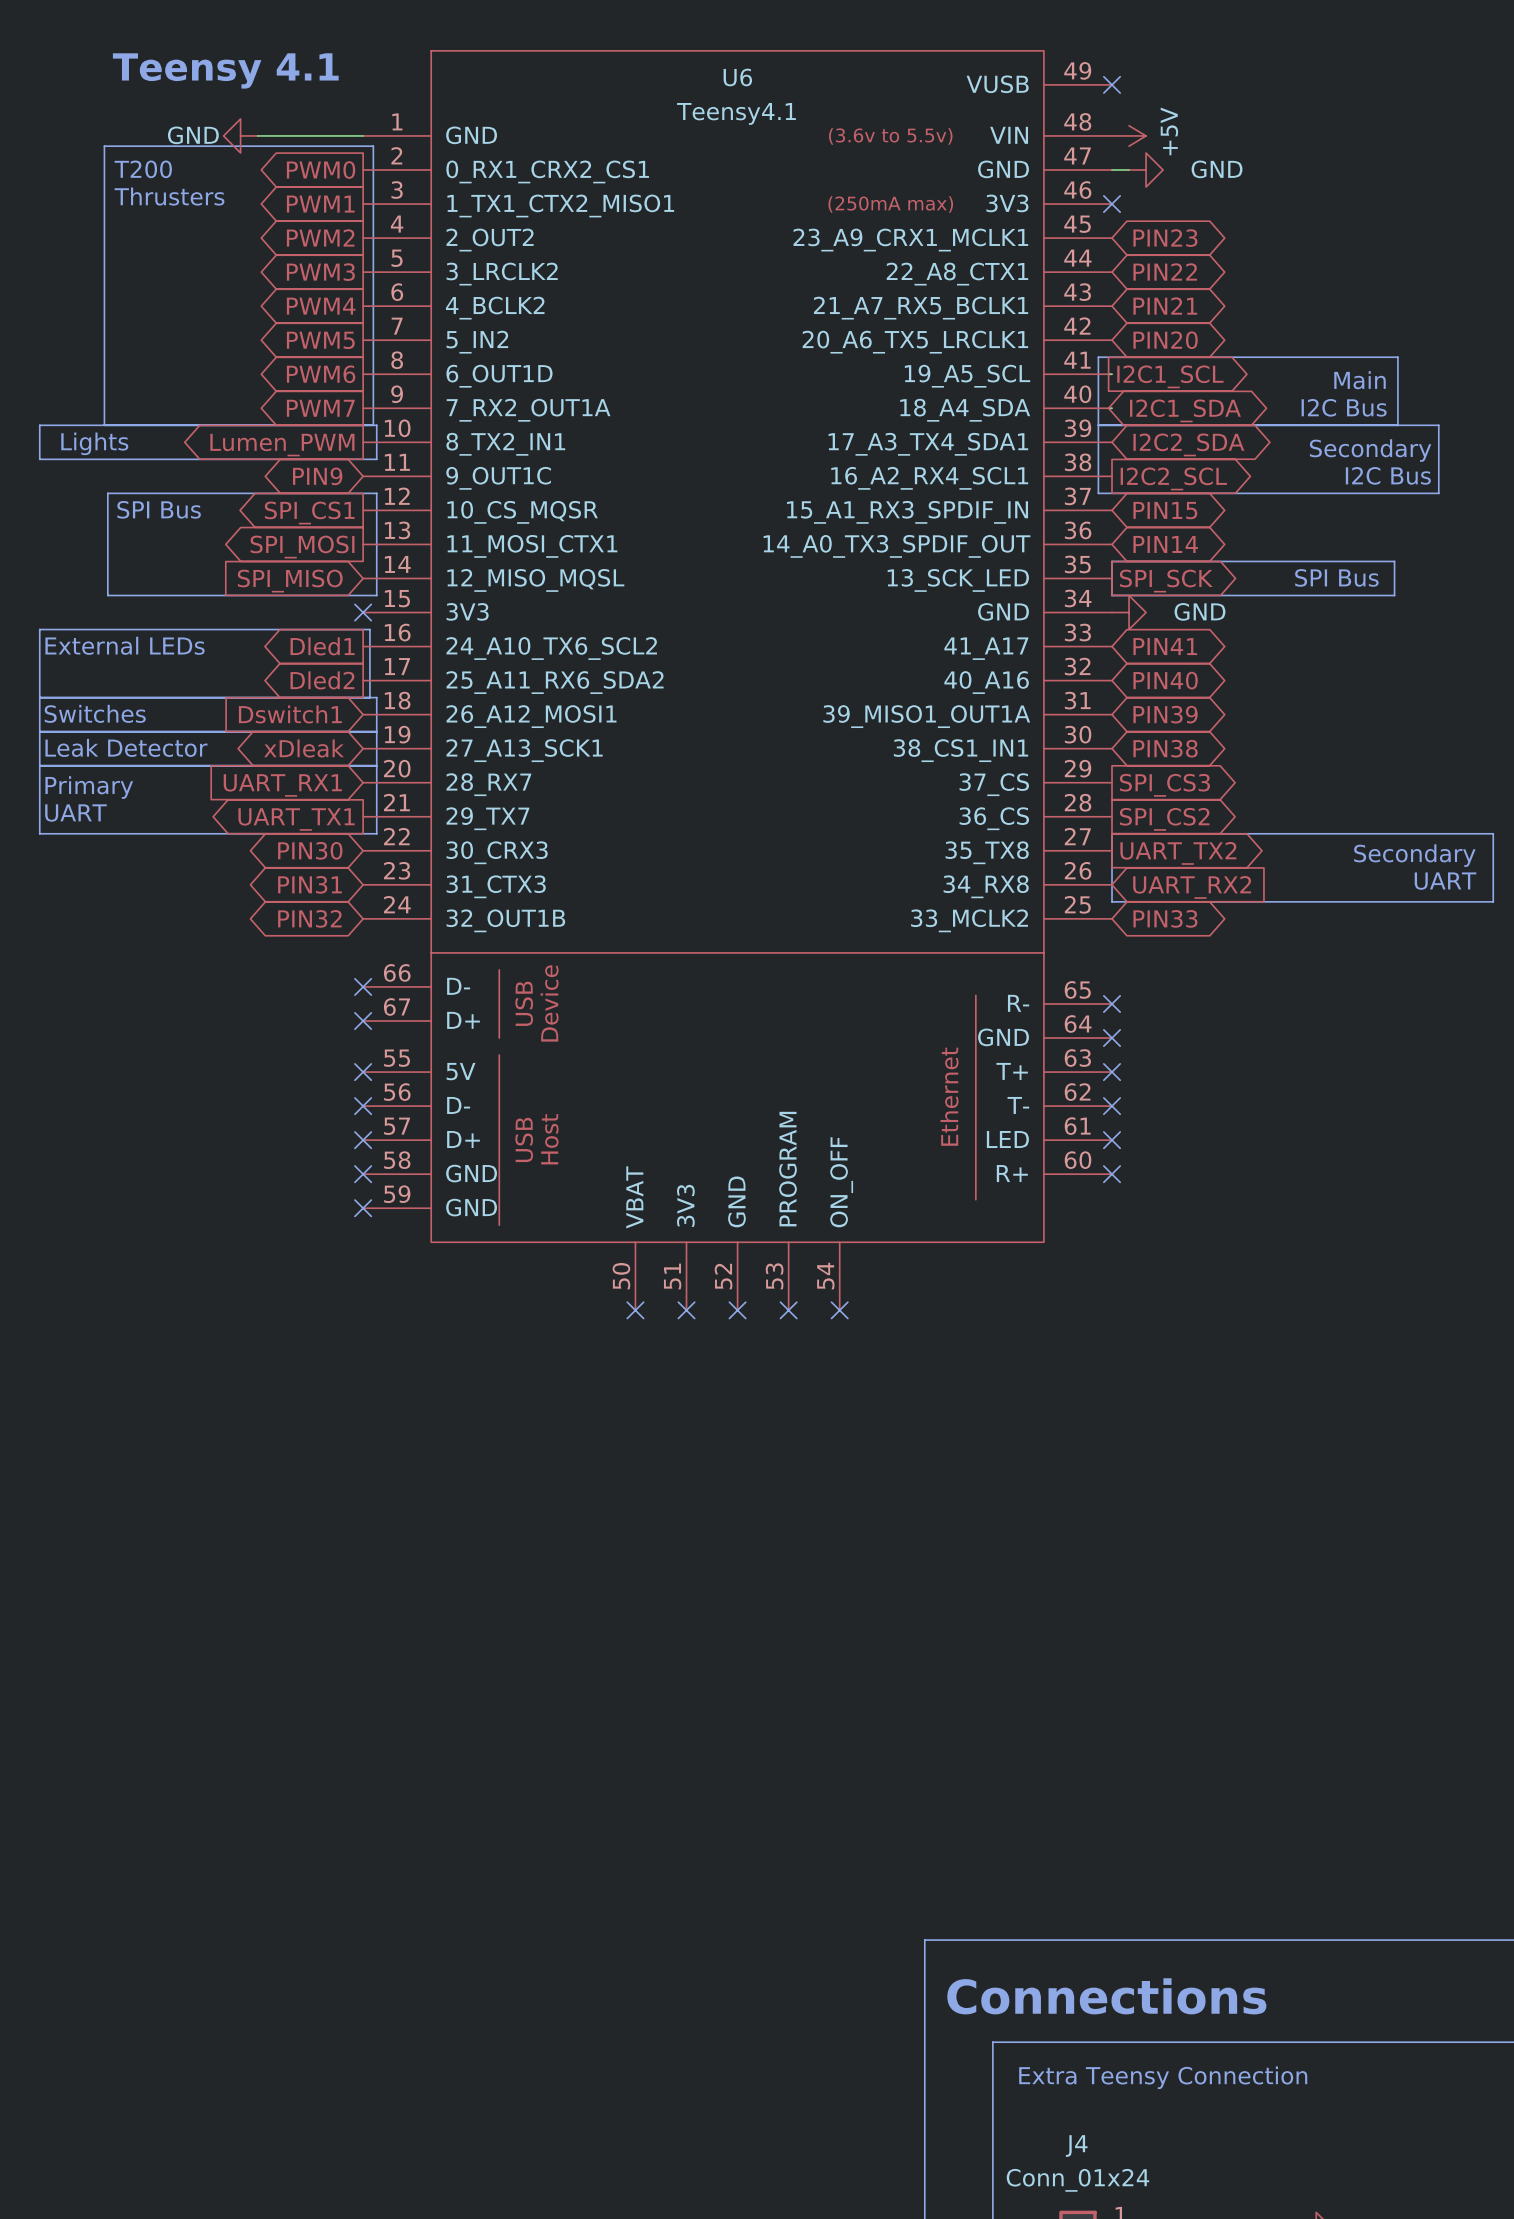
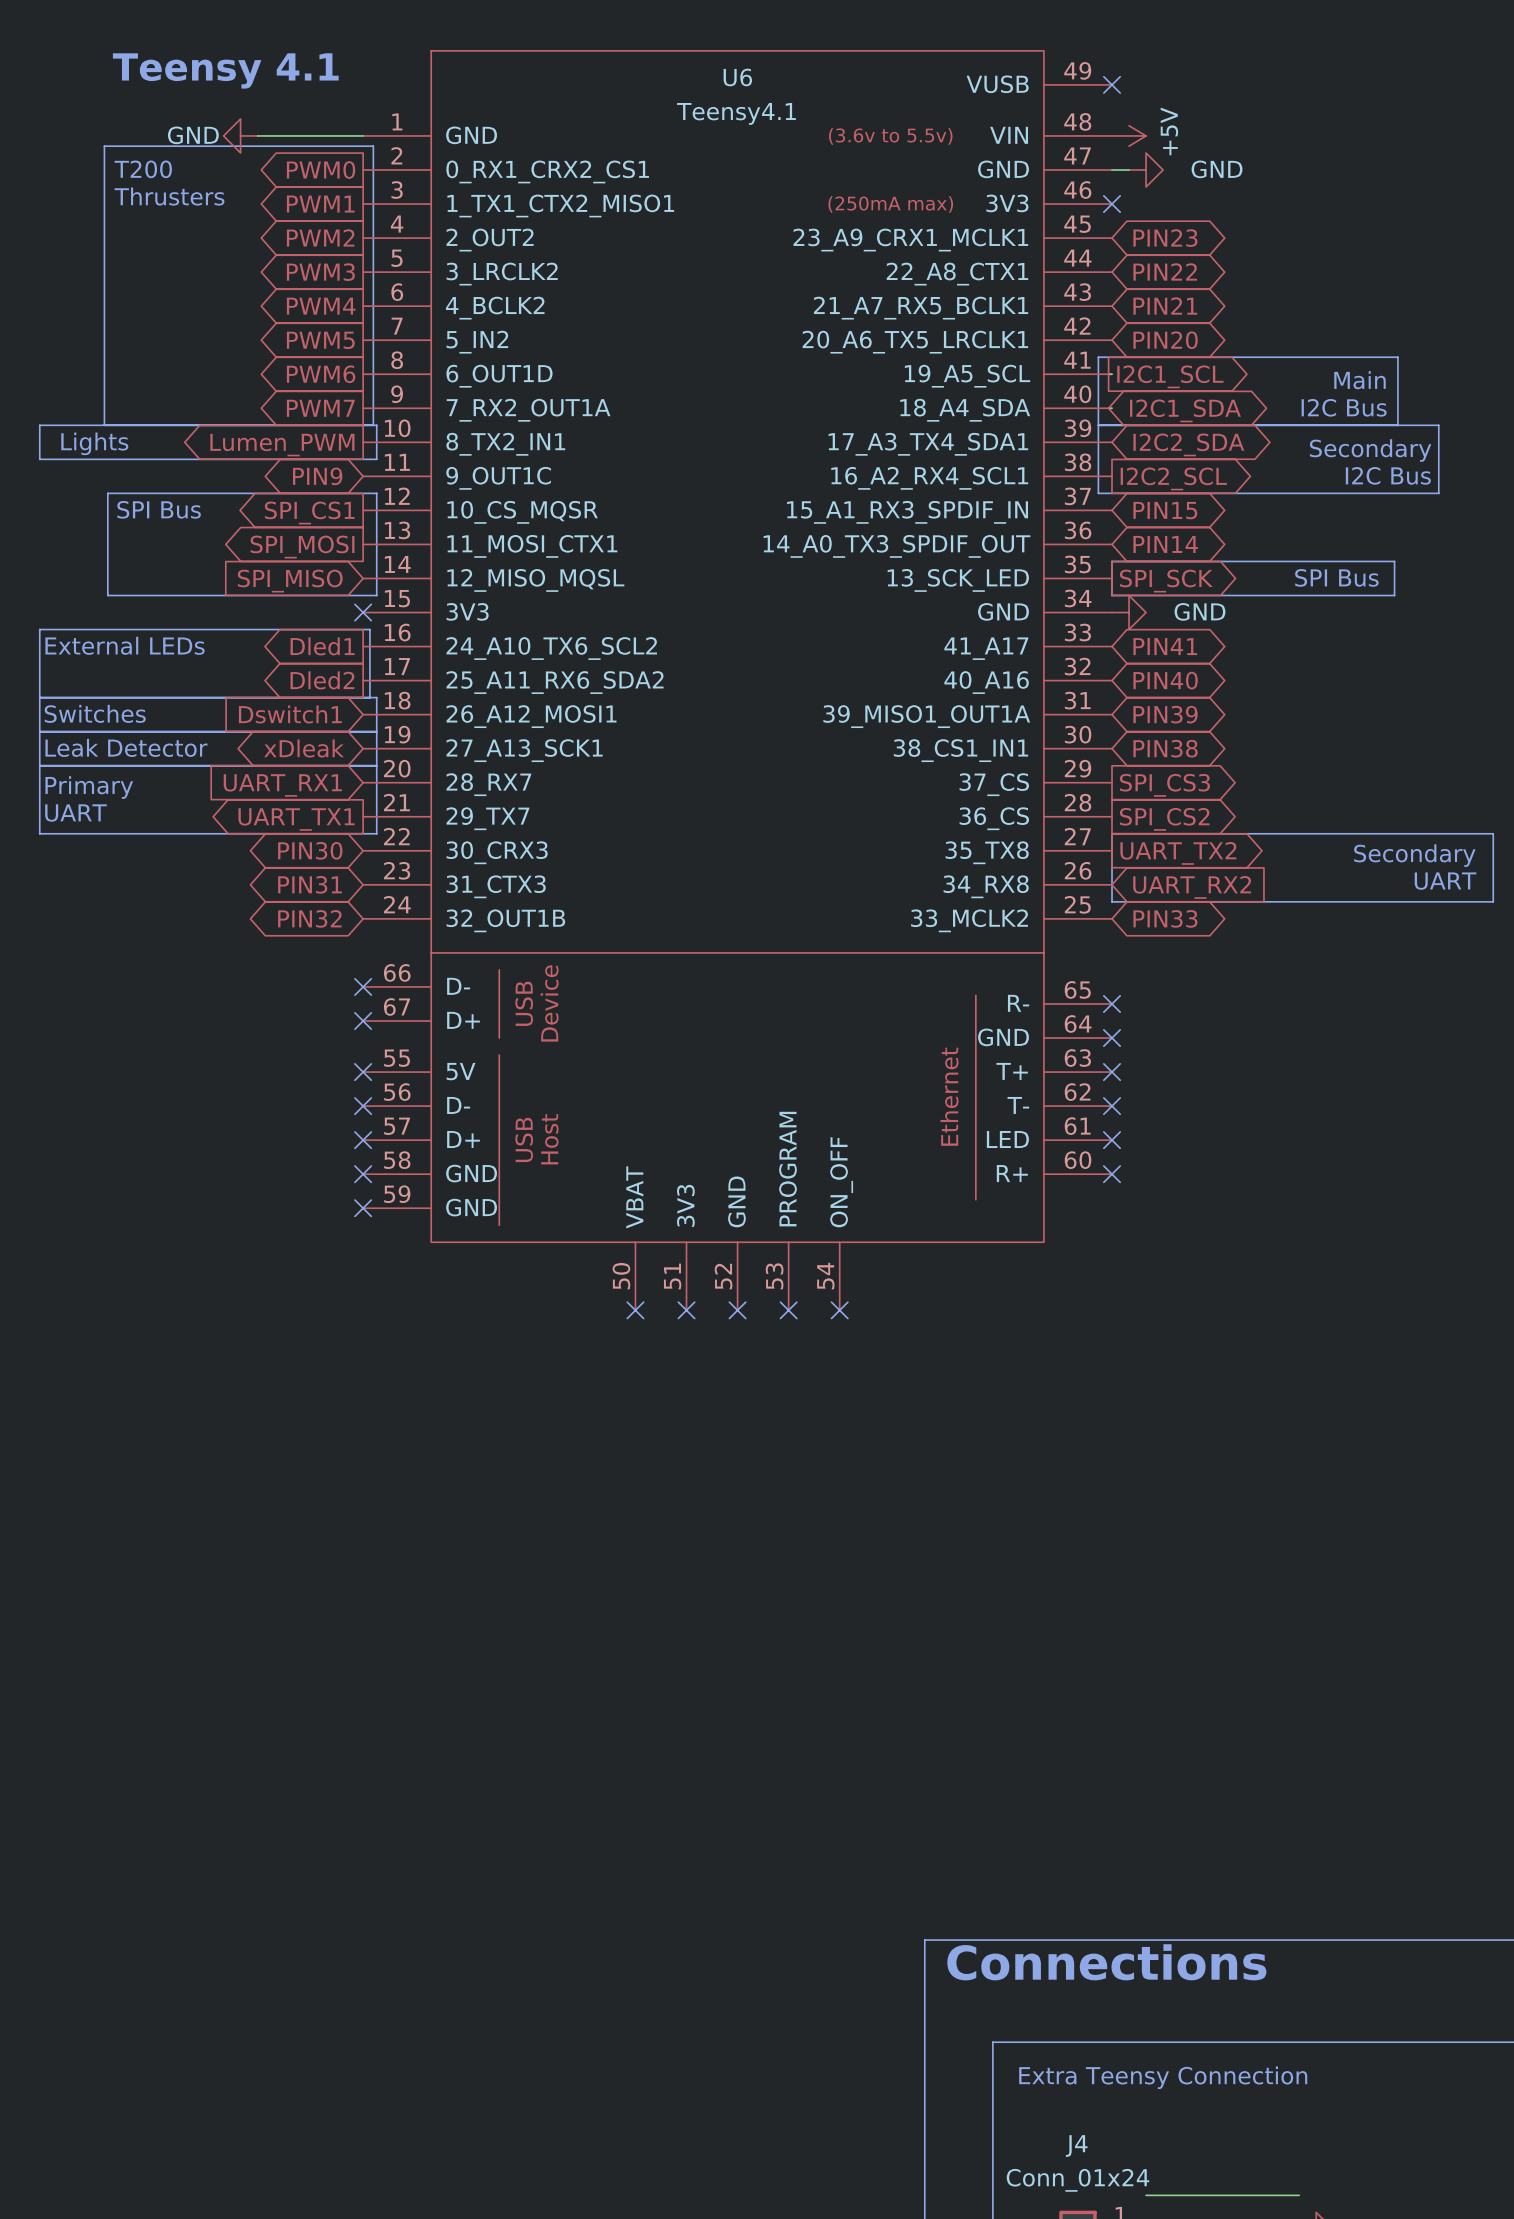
text position: Connections (1106, 1996) -> Connections (1106, 1962)
wire: none -> (1146, 2195) (1299, 2195)

